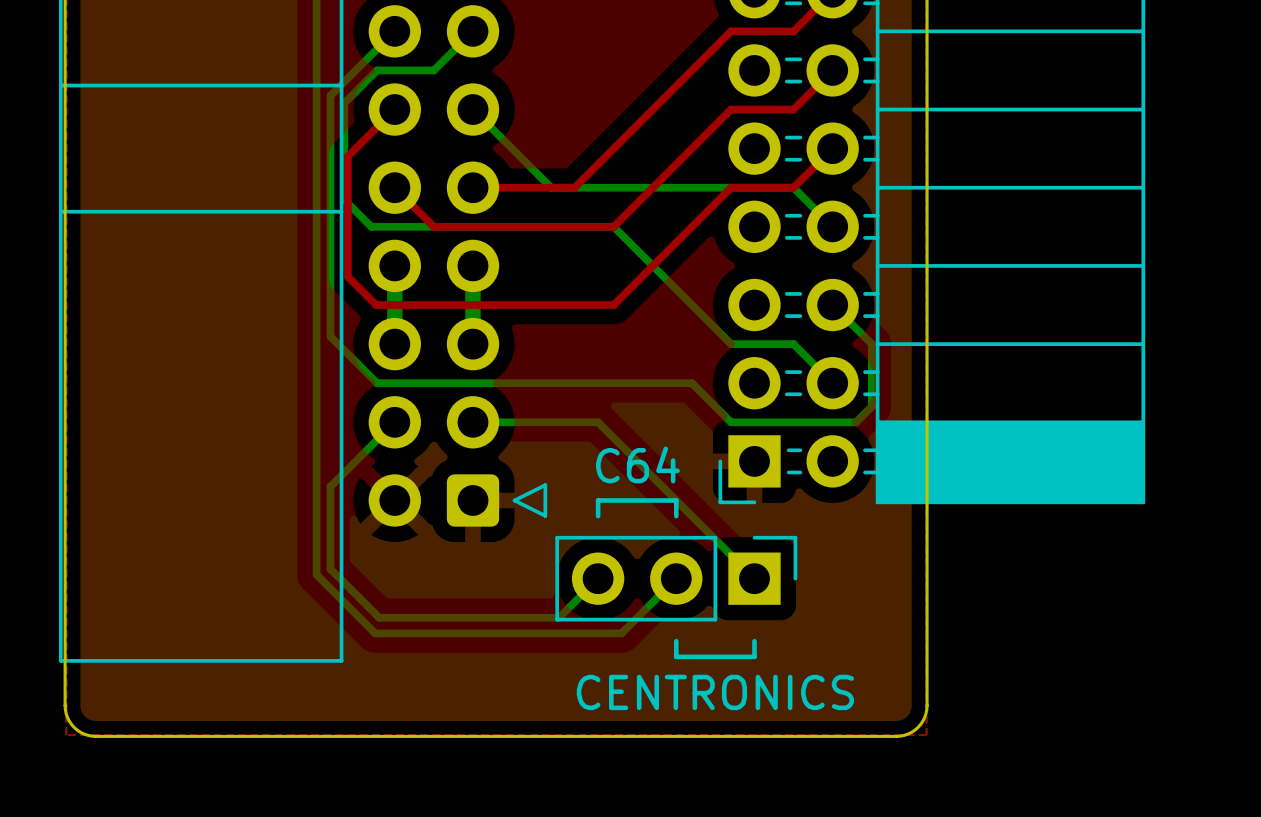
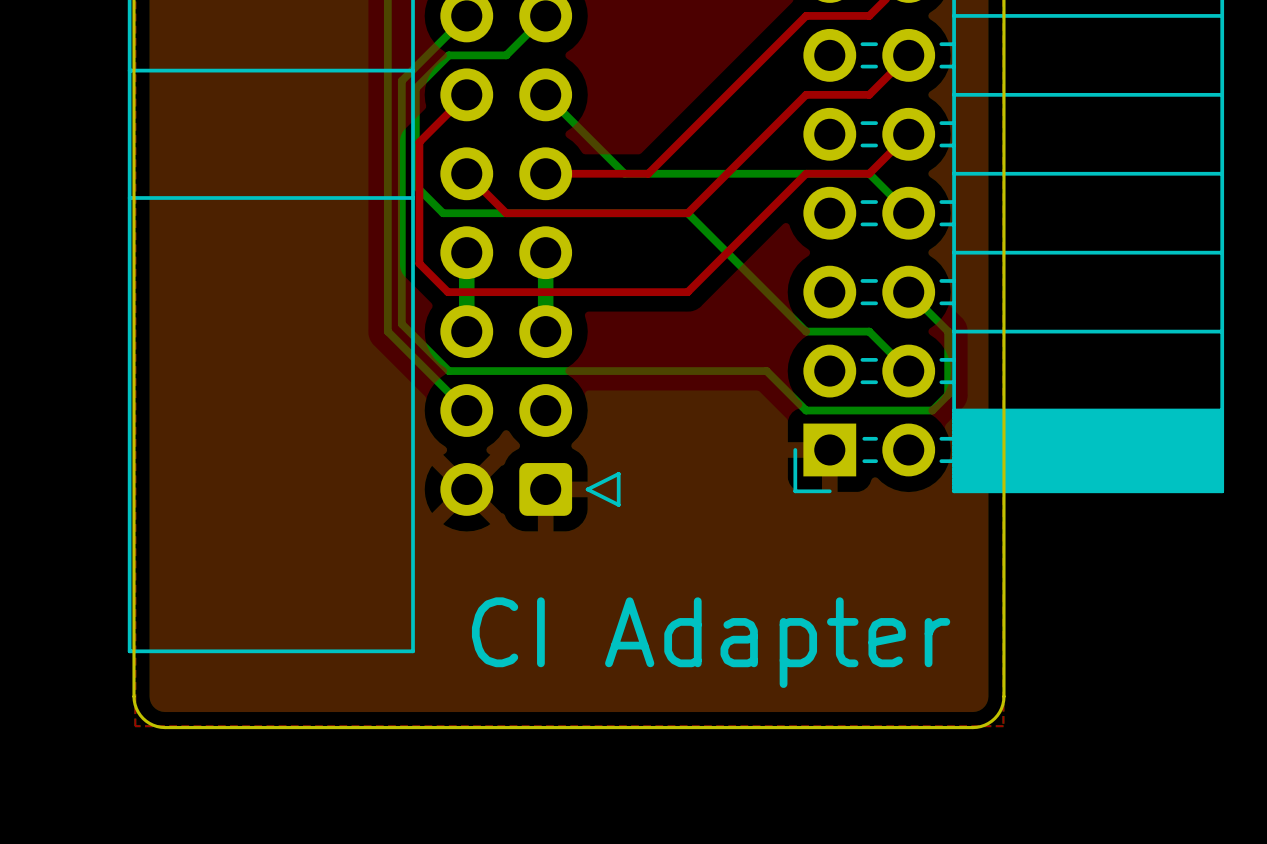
bottom track: (316, 344) (316, 574) (375, 633) (621, 633) (676, 578) -> (387, 331) (466, 410)
bottom track: (394, 422) (330, 486) (330, 569) (379, 617) (559, 617) (598, 578) -> none
bottom track: (473, 422) (598, 422) (754, 578) -> none
text: C64 (637, 464) -> none
line: (598, 516) (598, 500) (676, 500) (676, 516) -> none
part: (676, 578) -> none
line: (676, 641) (676, 656) (754, 656) (754, 641) -> none
text: none -> CI Adapter (711, 642)
text: CENTRONICS (715, 692) -> none

